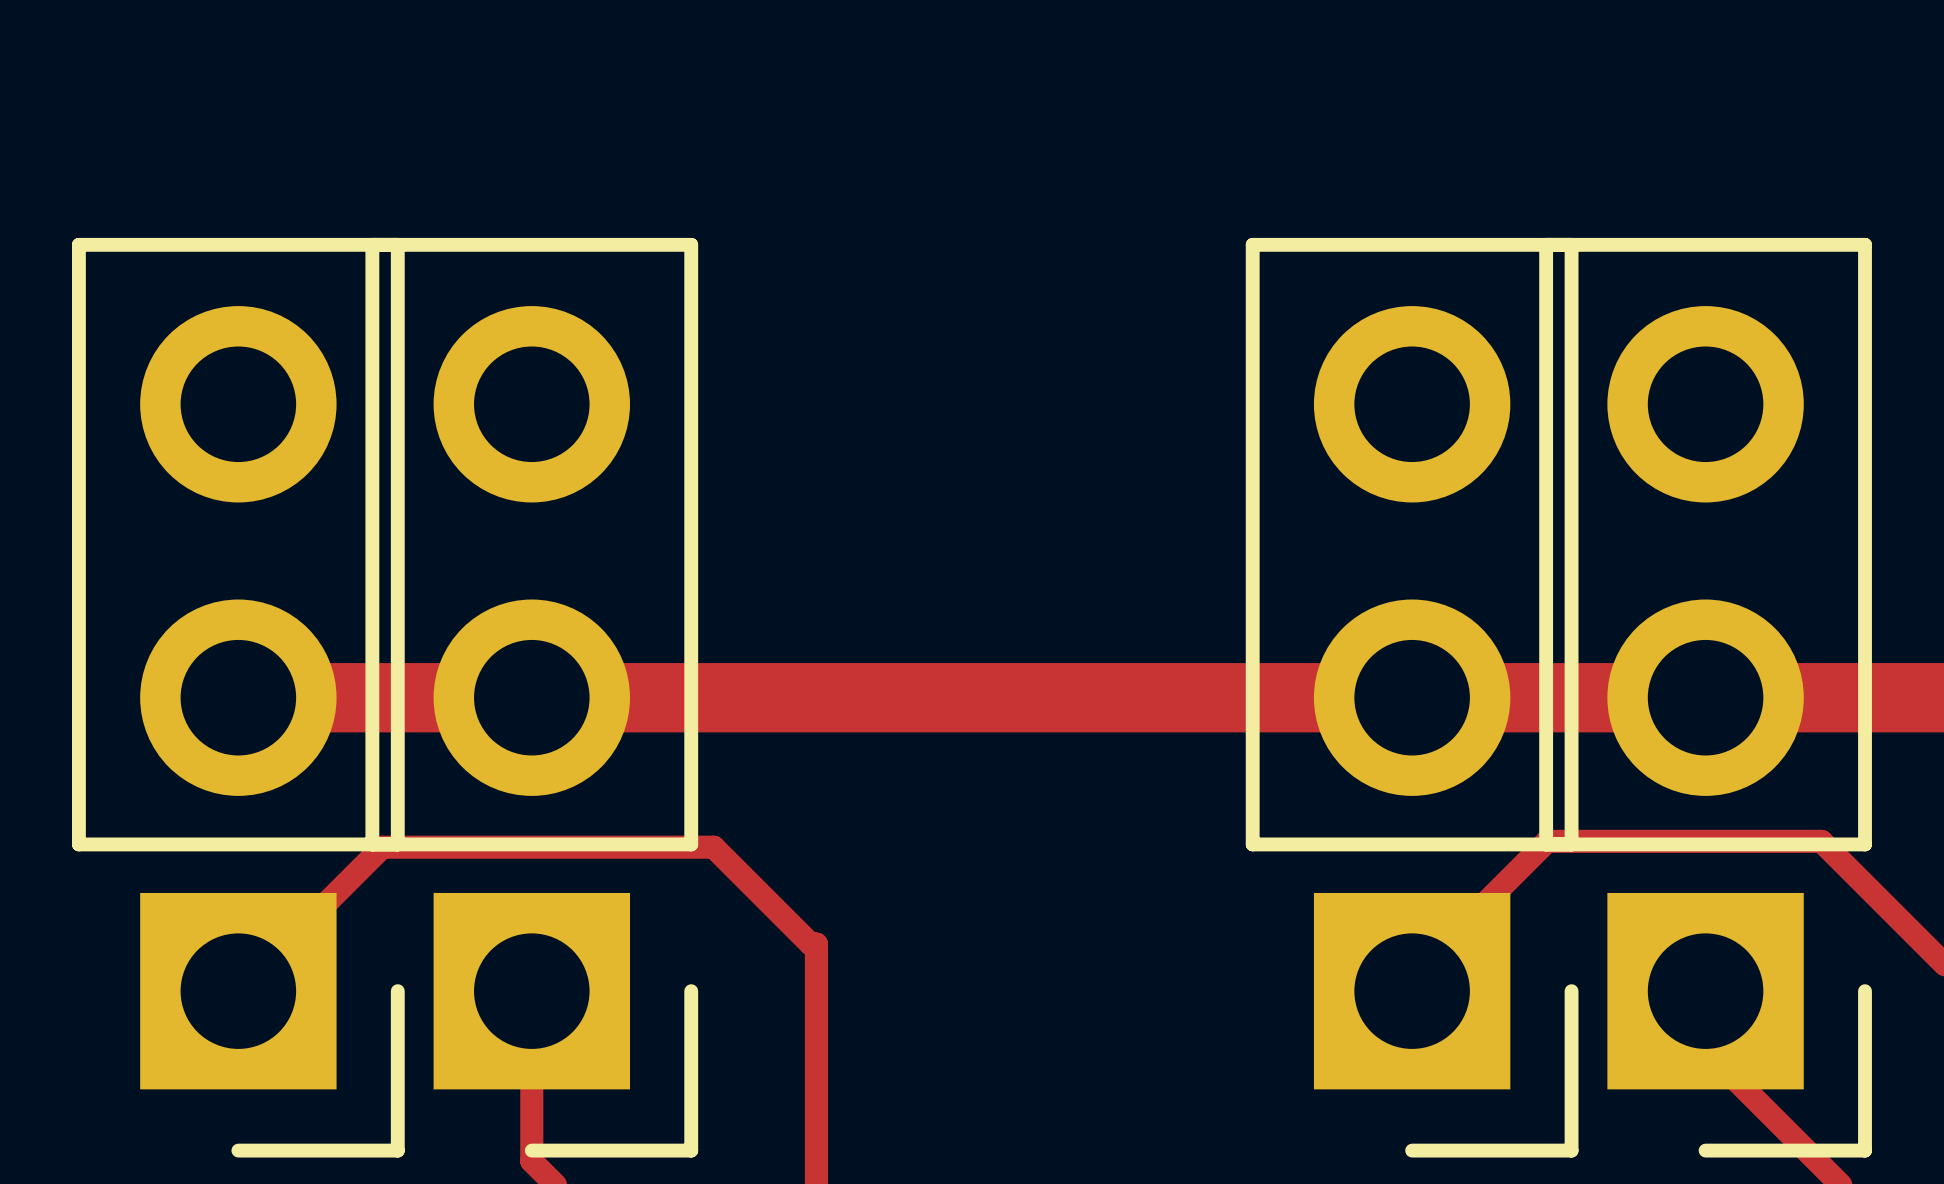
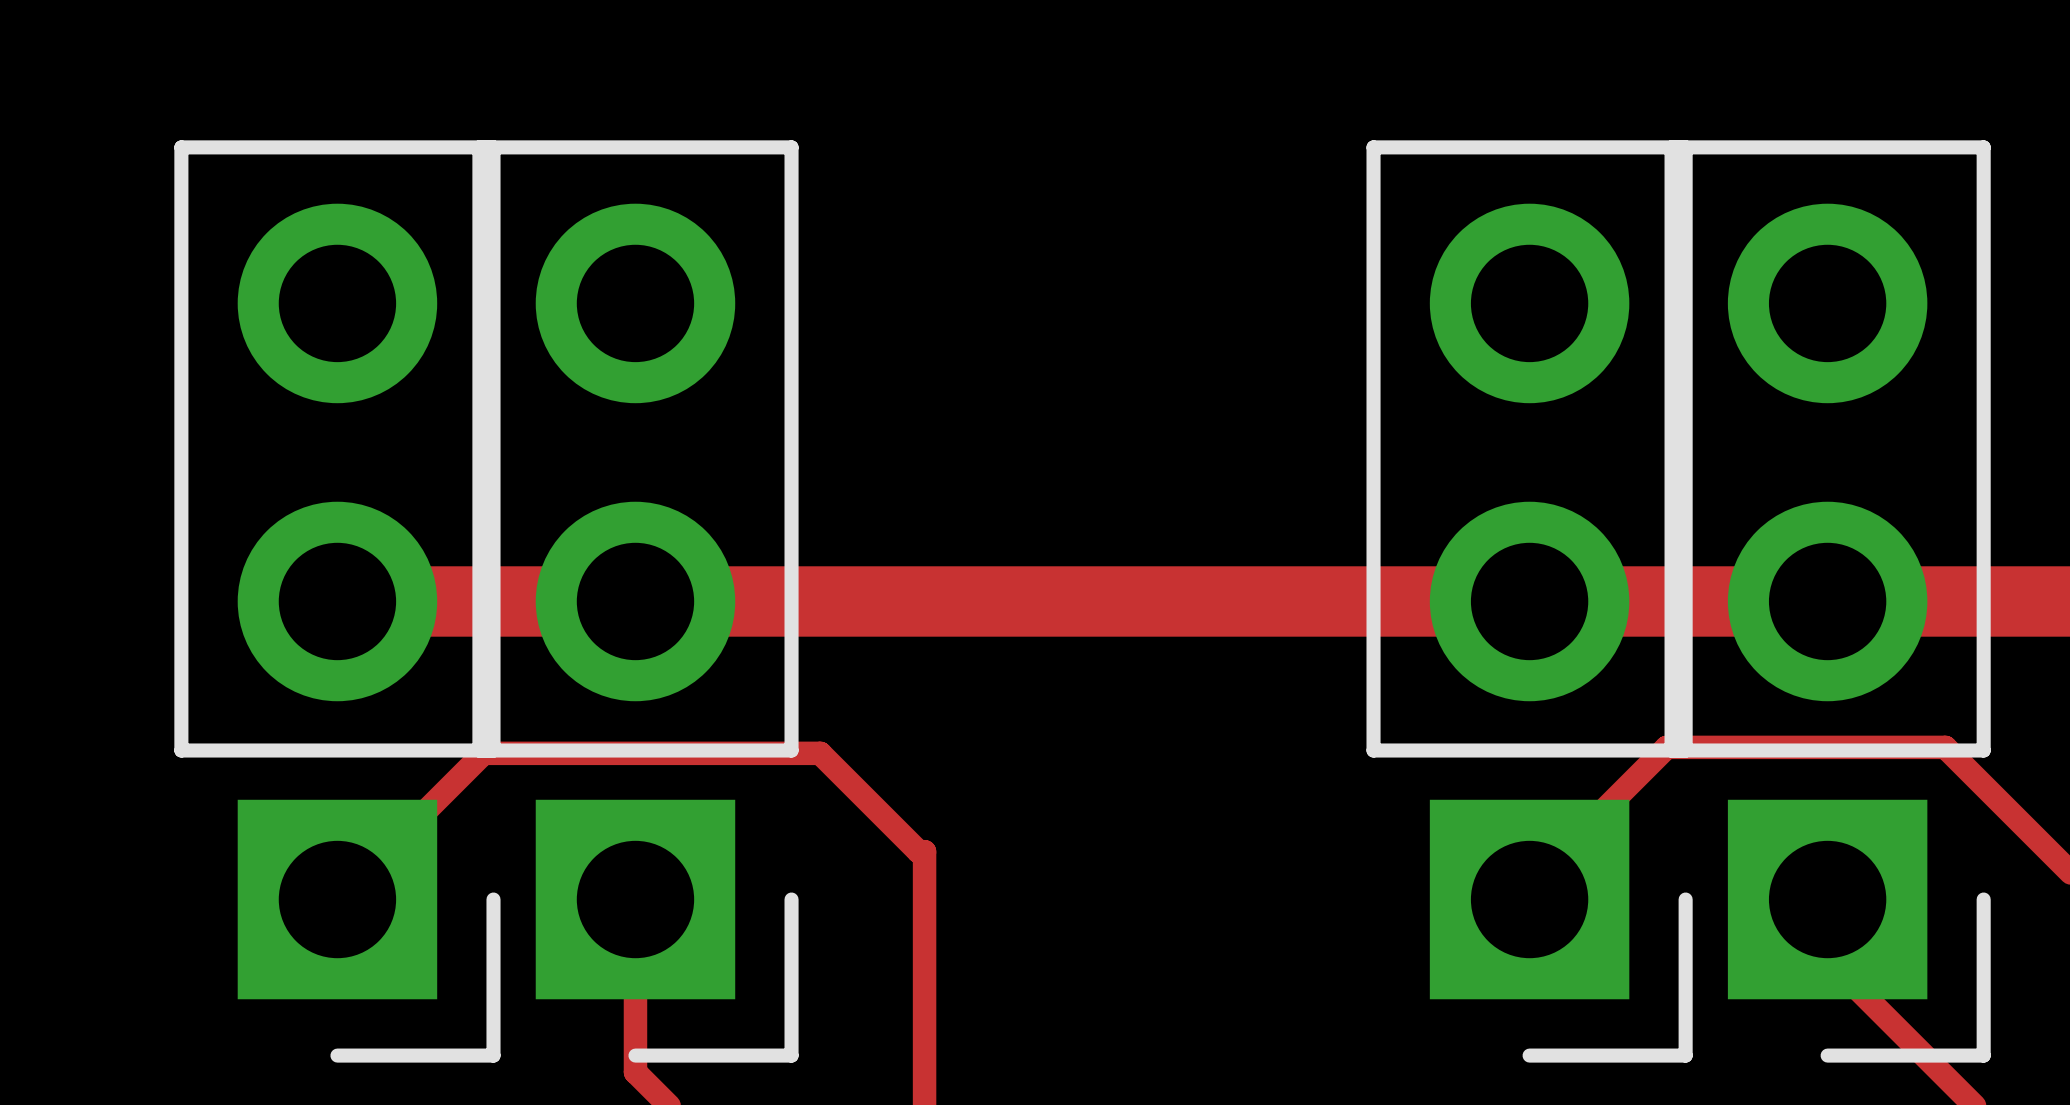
part footprint: [71, 237, 405, 1158] -> [174, 140, 501, 1063]
part footprint: [365, 237, 699, 1158] -> [472, 140, 799, 1063]
part footprint: [1245, 237, 1579, 1158] -> [1366, 140, 1693, 1063]
part footprint: [1539, 237, 1872, 1158] -> [1664, 140, 1991, 1063]

